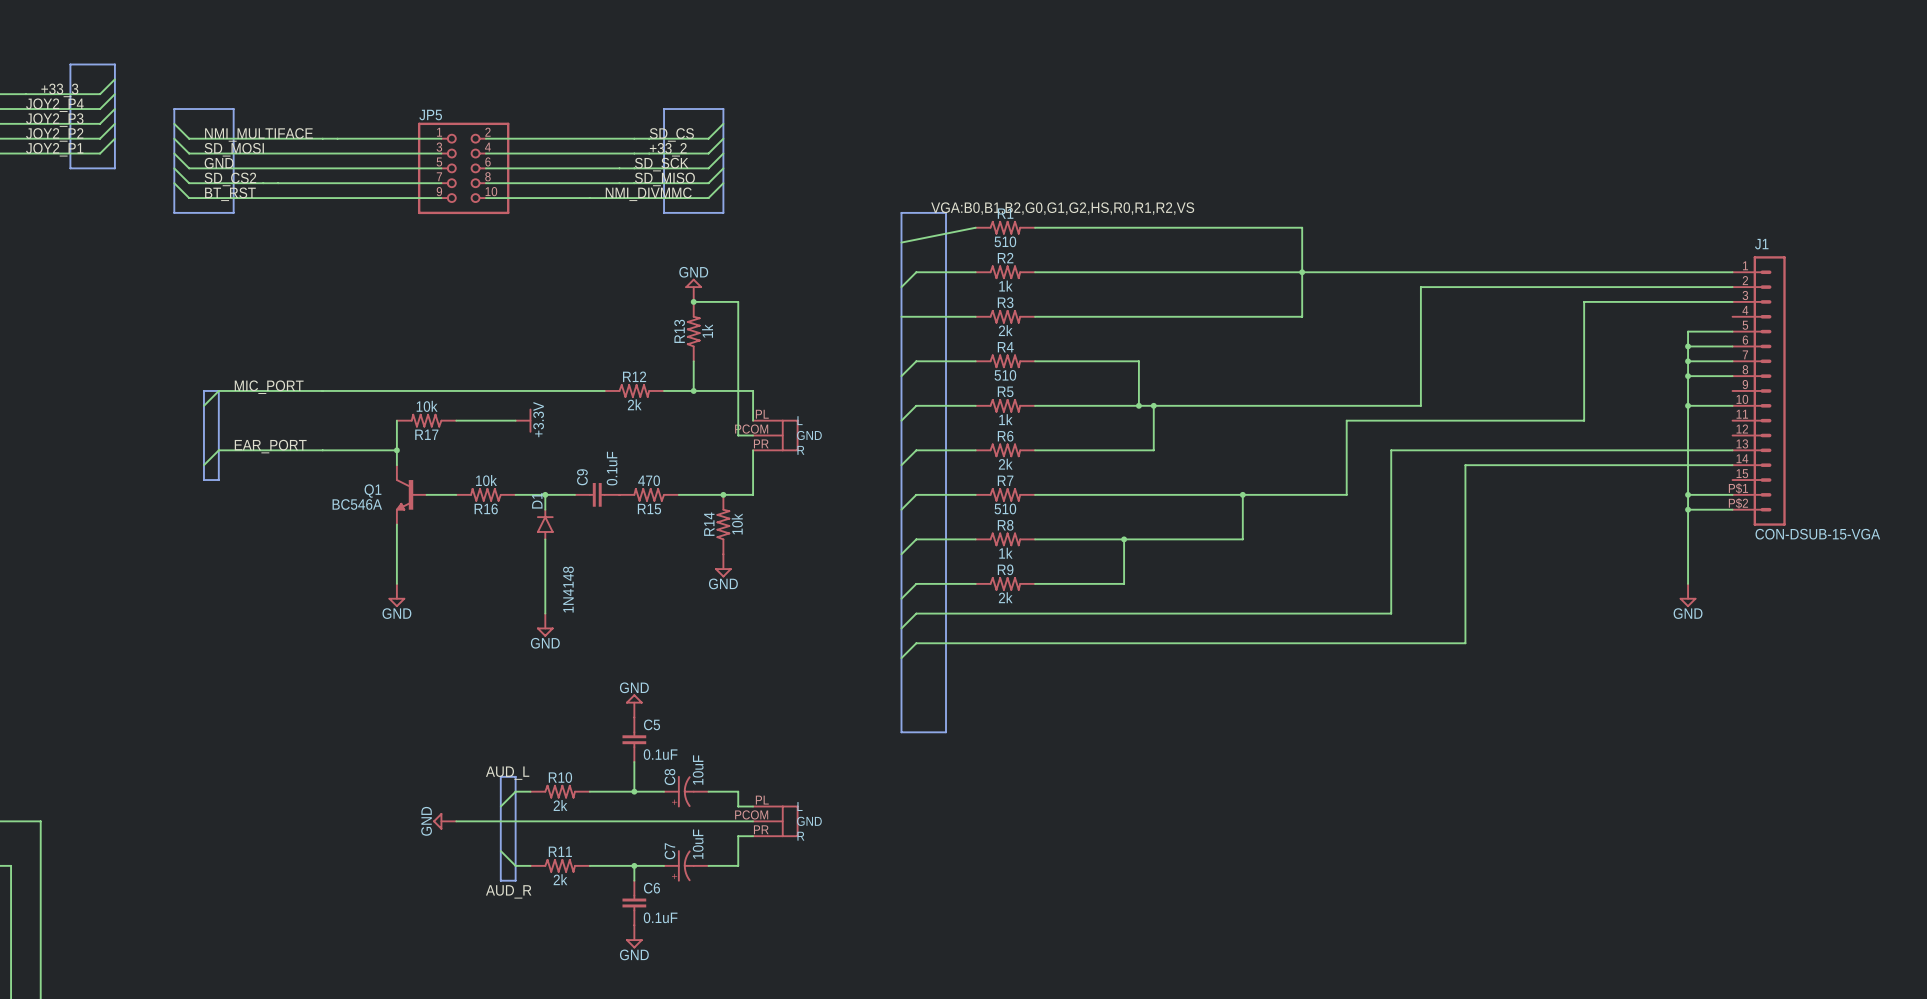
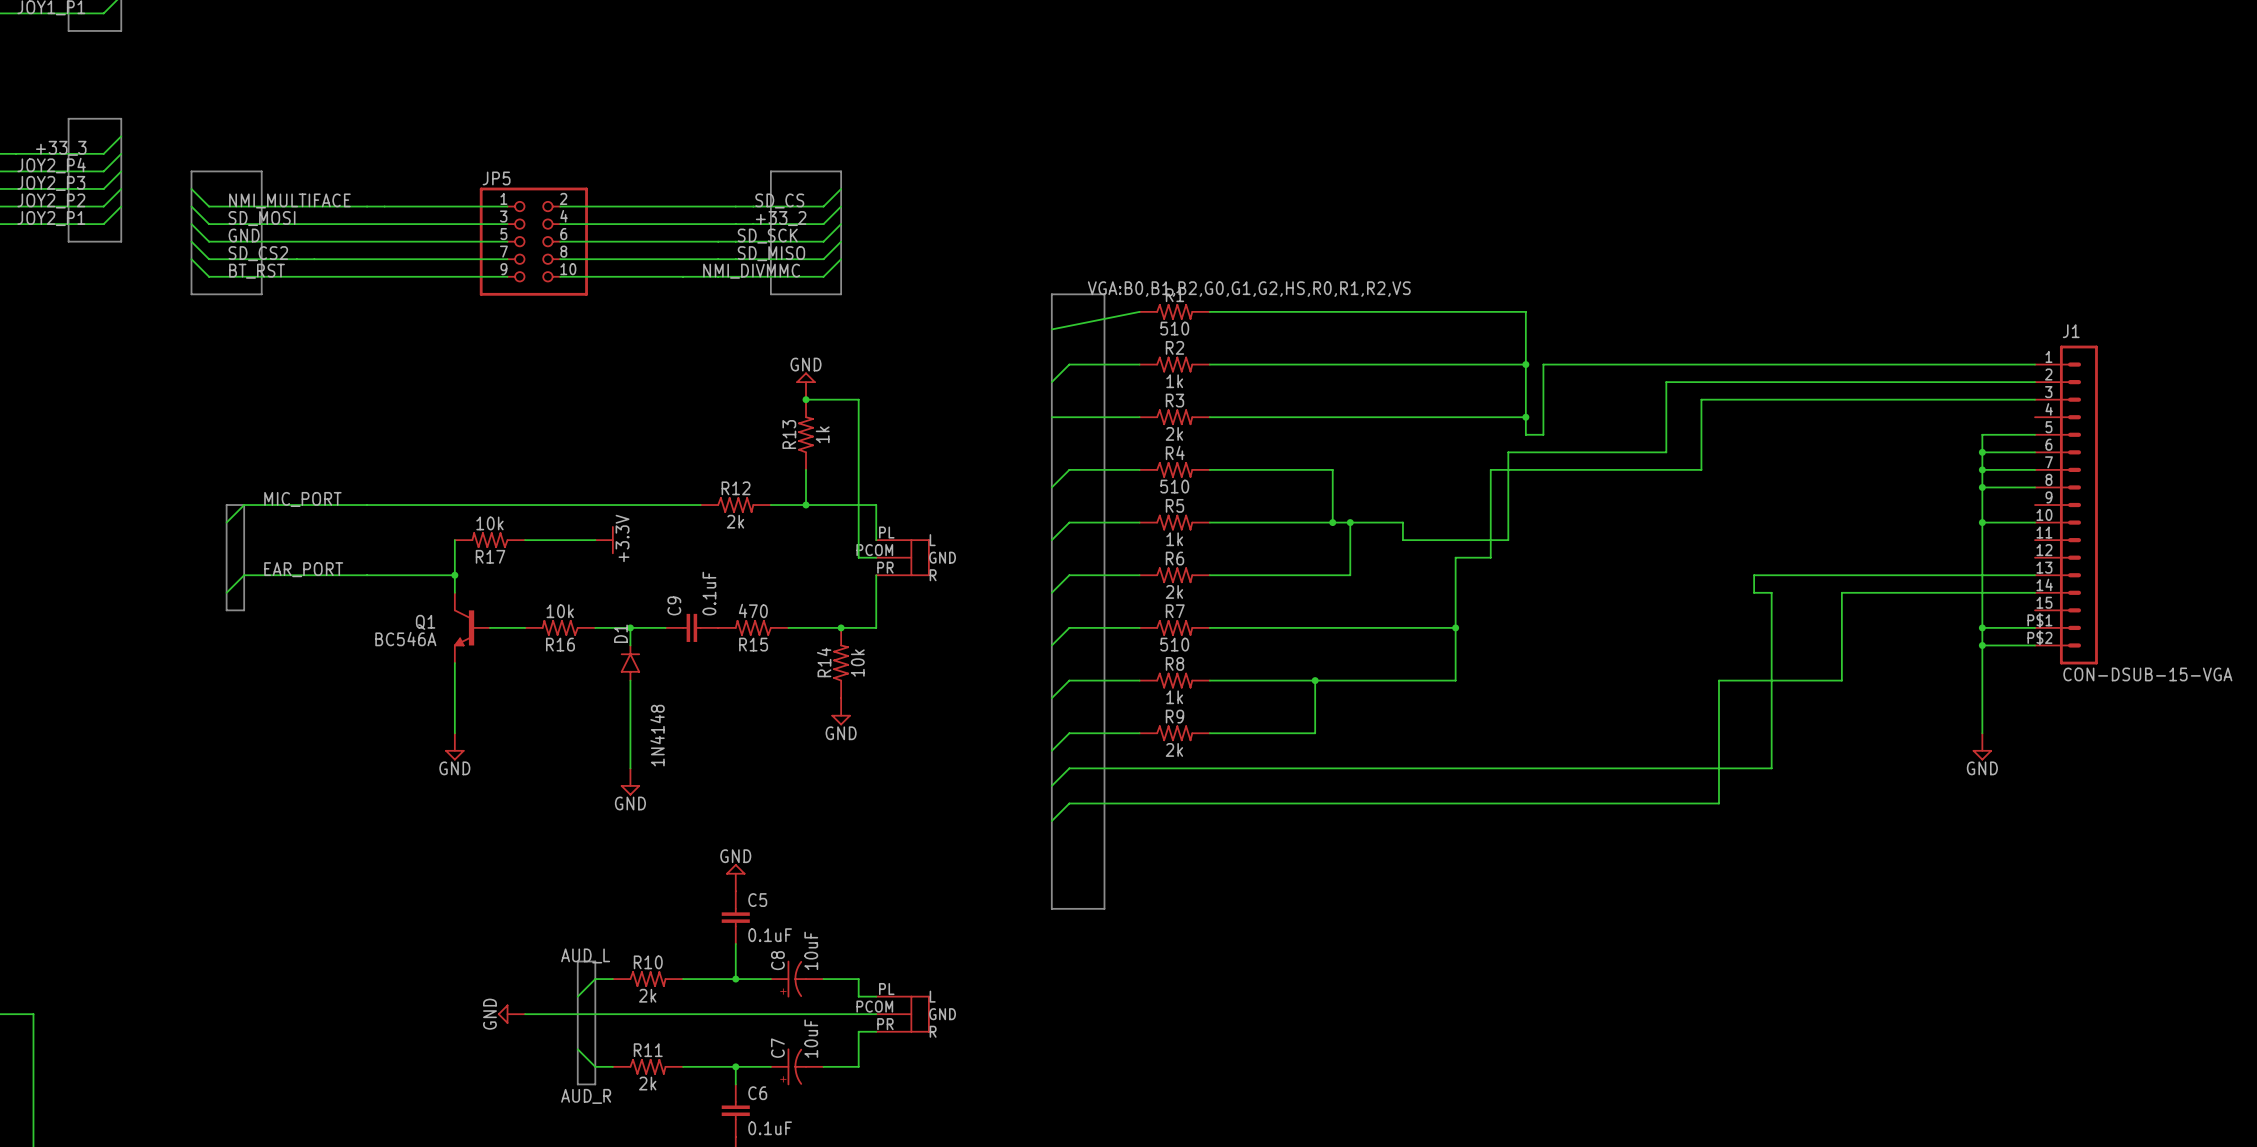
wire: (1302, 272) (1317, 272) -> (1525, 417) (1525, 434) (1543, 434) (1543, 364)
wire: (1584, 301) (1584, 420) (1346, 420) (1346, 494) (1242, 494) -> (1859, 399) (1701, 399) (1701, 469) (1490, 469) (1490, 557) (1455, 557) (1455, 627)
junction: none -> (1525, 417)
wire: (1420, 346) (1420, 405) (1198, 405) -> (1666, 452) (1508, 452) (1508, 540) (1402, 540) (1402, 522)
wire: (1495, 450) (1391, 450) (1391, 613) -> (1771, 592) (1771, 768) (1631, 768)
wire: none -> (1754, 575) (1754, 592)
wire: (1495, 465) (1465, 465) (1465, 539) -> (1841, 592) (1841, 680) (1718, 680)
wire: (1509, 465) (1569, 465) -> none

